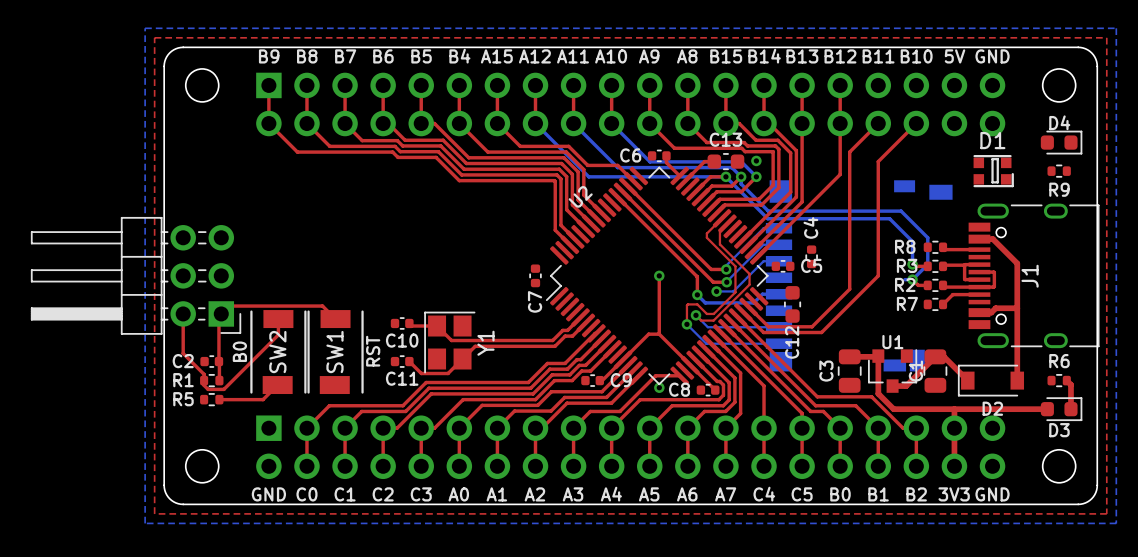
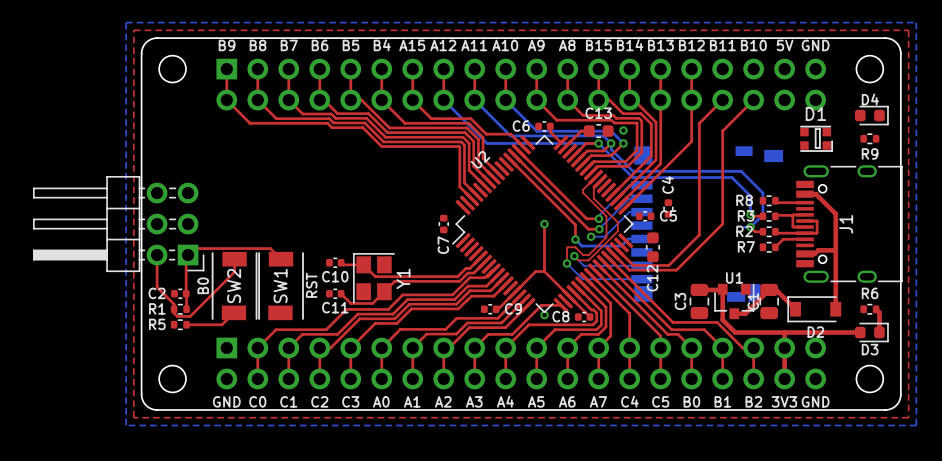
top track: (595, 333) (565, 363) (547, 363) (528, 382) (426, 382) (402, 405) (391, 405) -> (492, 270) (485, 277) (469, 277) (452, 294) (402, 294) (388, 309) (346, 309) (326, 329)
top track: (588, 352) (567, 369) (549, 369) (530, 388) (428, 388) (405, 411) -> (486, 286) (468, 286) (454, 299) (407, 299) (393, 314) (357, 314) (337, 334)
top track: (593, 357) (585, 365) (579, 365) (569, 374) (552, 374) (533, 393) (431, 393) (396, 428) -> (490, 290) (469, 290) (456, 304) (409, 304) (394, 318) (359, 318) (330, 348)
top track: (597, 364) (590, 371) (581, 371) (572, 380) (554, 380) (535, 399) (463, 399) (434, 428) (421, 428) -> (493, 296) (471, 296) (458, 308) (411, 308) (396, 323) (375, 323) (350, 348)

